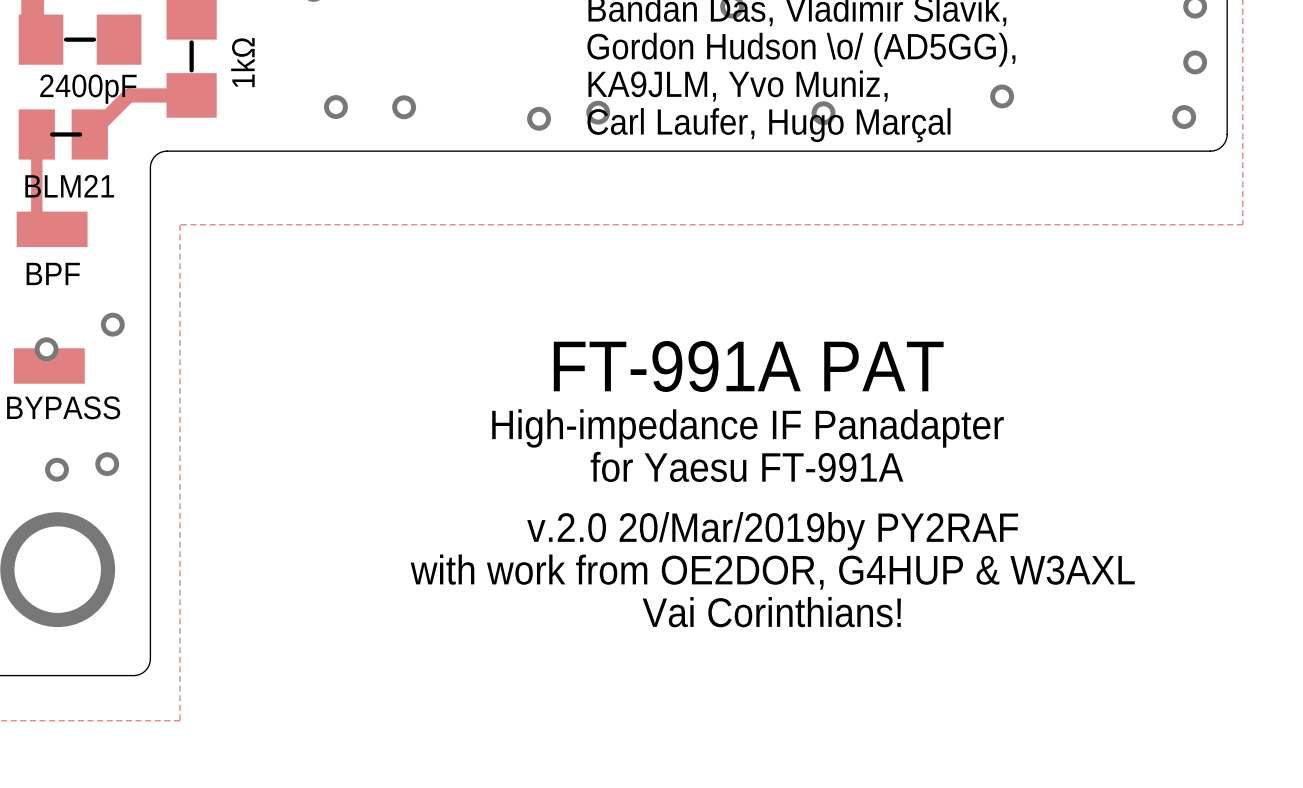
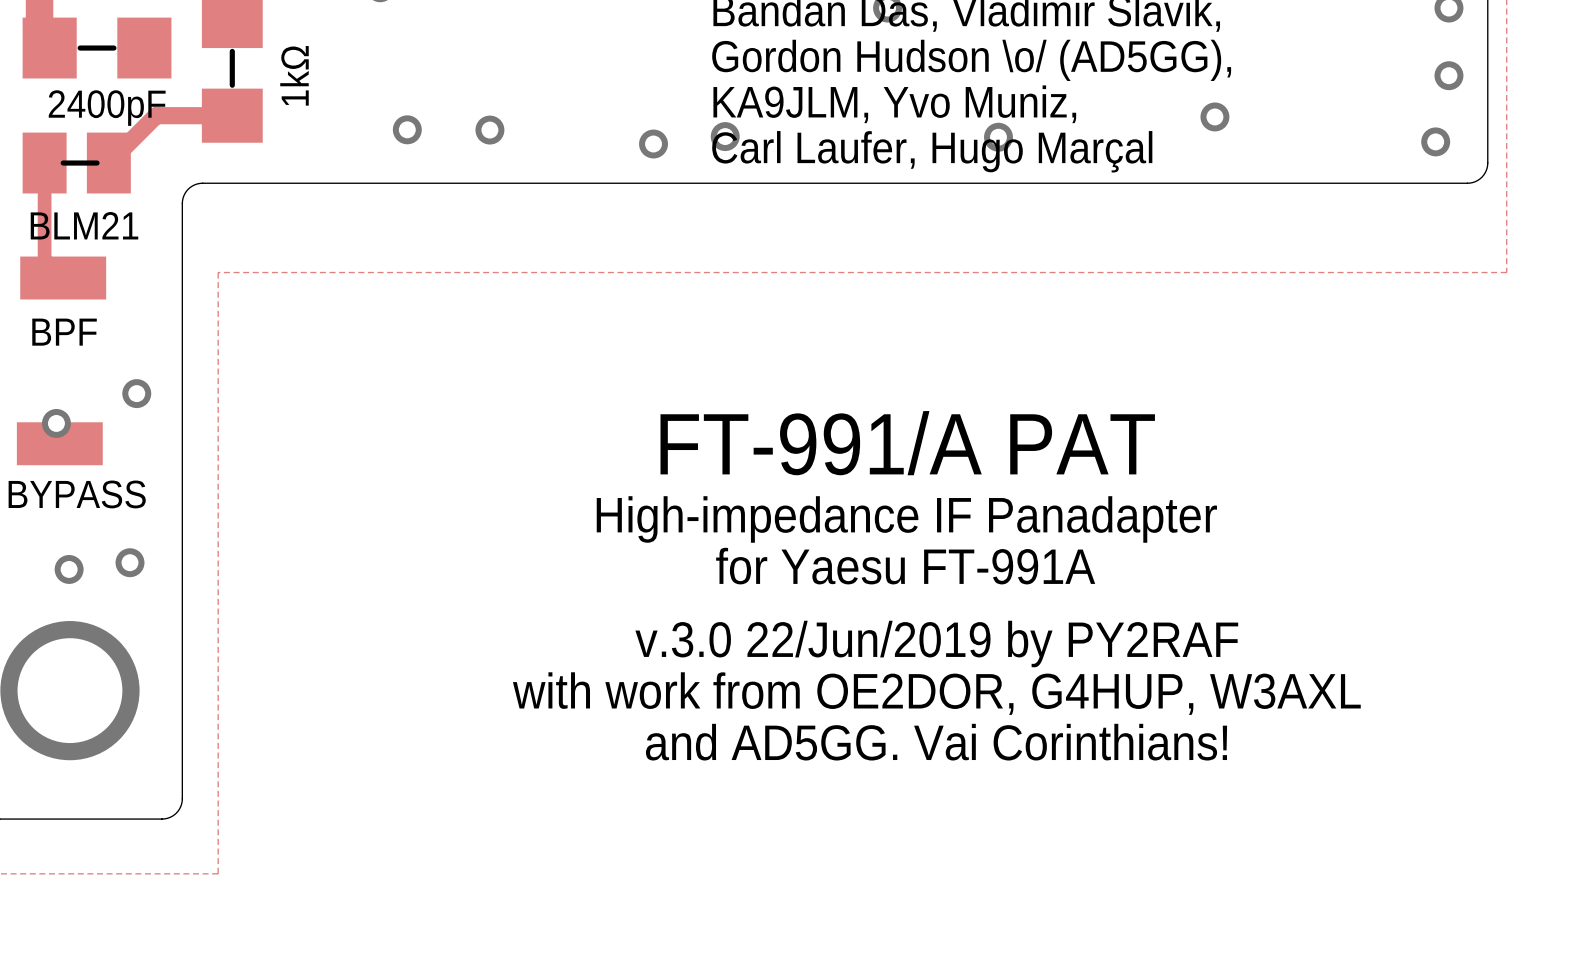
text: FT-991A PAT (748, 366) -> FT-991/A PAT (907, 443)
text: v.2.0 20/Mar/2019by PY2RAF (772, 531) -> v.3.0 22/Jun/2019 by PY2RAF (936, 644)
text: with work from OE2DOR, G4HUP & W3AXL (772, 572) -> with work from OE2DOR, G4HUP, W3AXL (936, 693)
text: Vai Corinthians! (771, 612) -> and AD5GG. Vai Corinthians! (936, 742)

